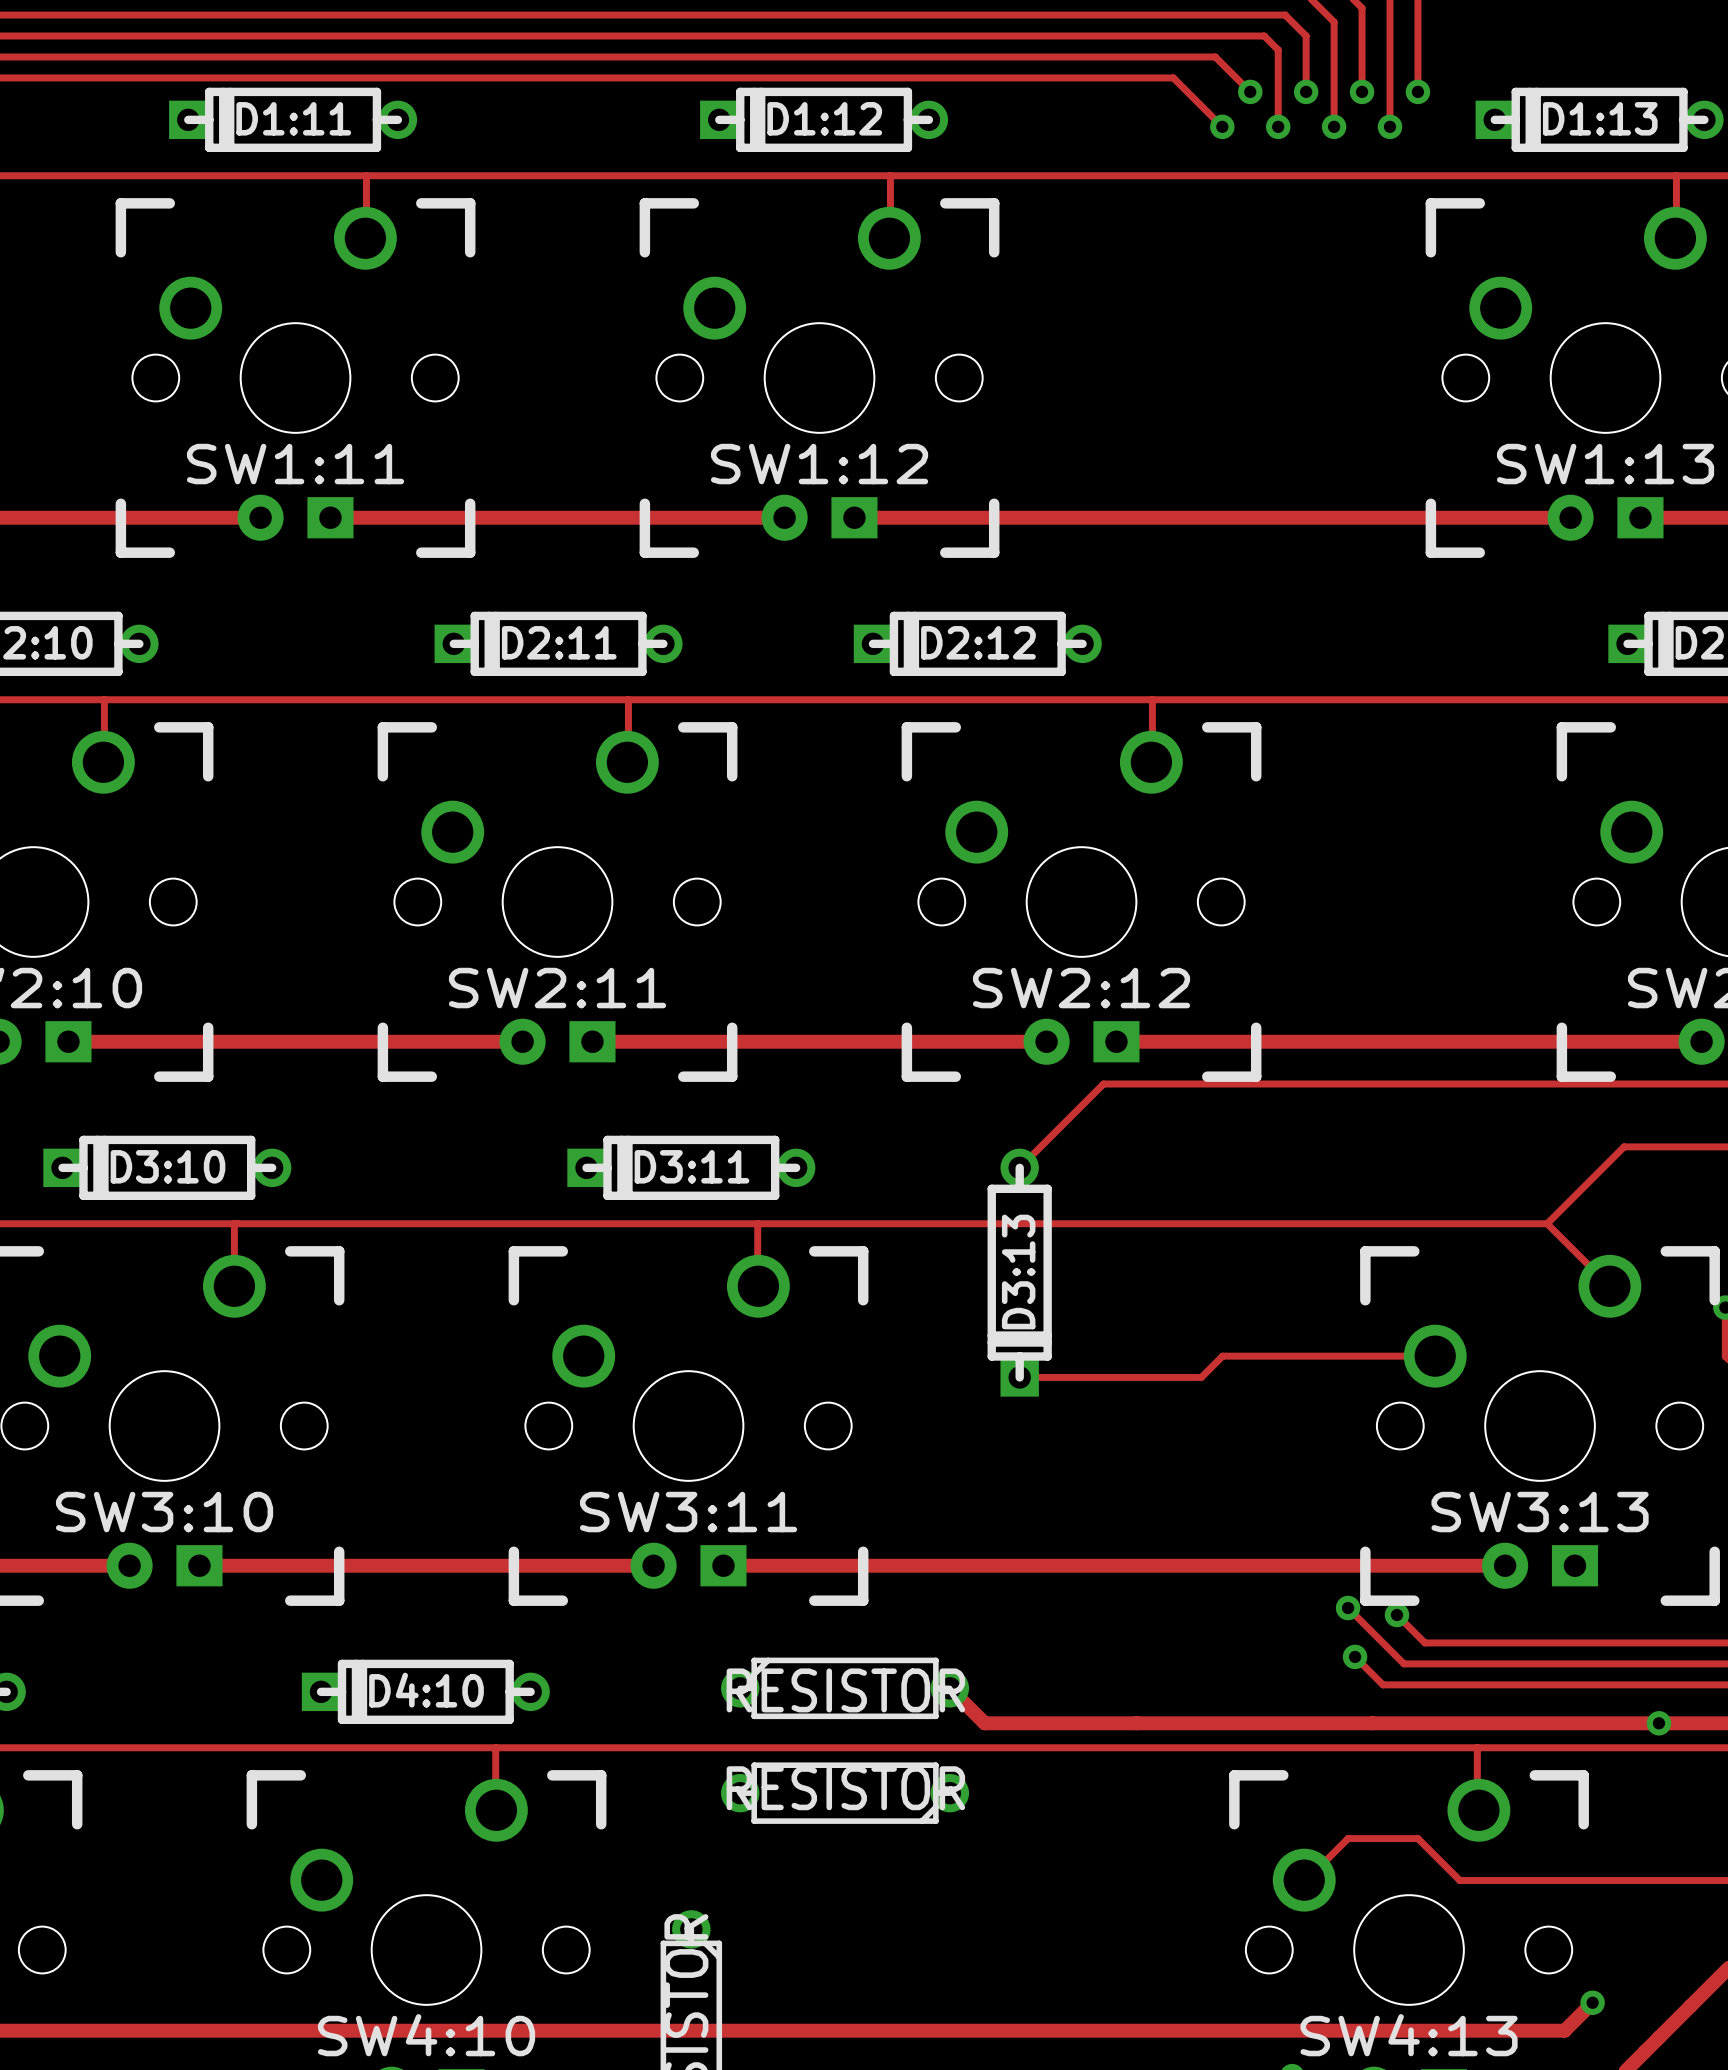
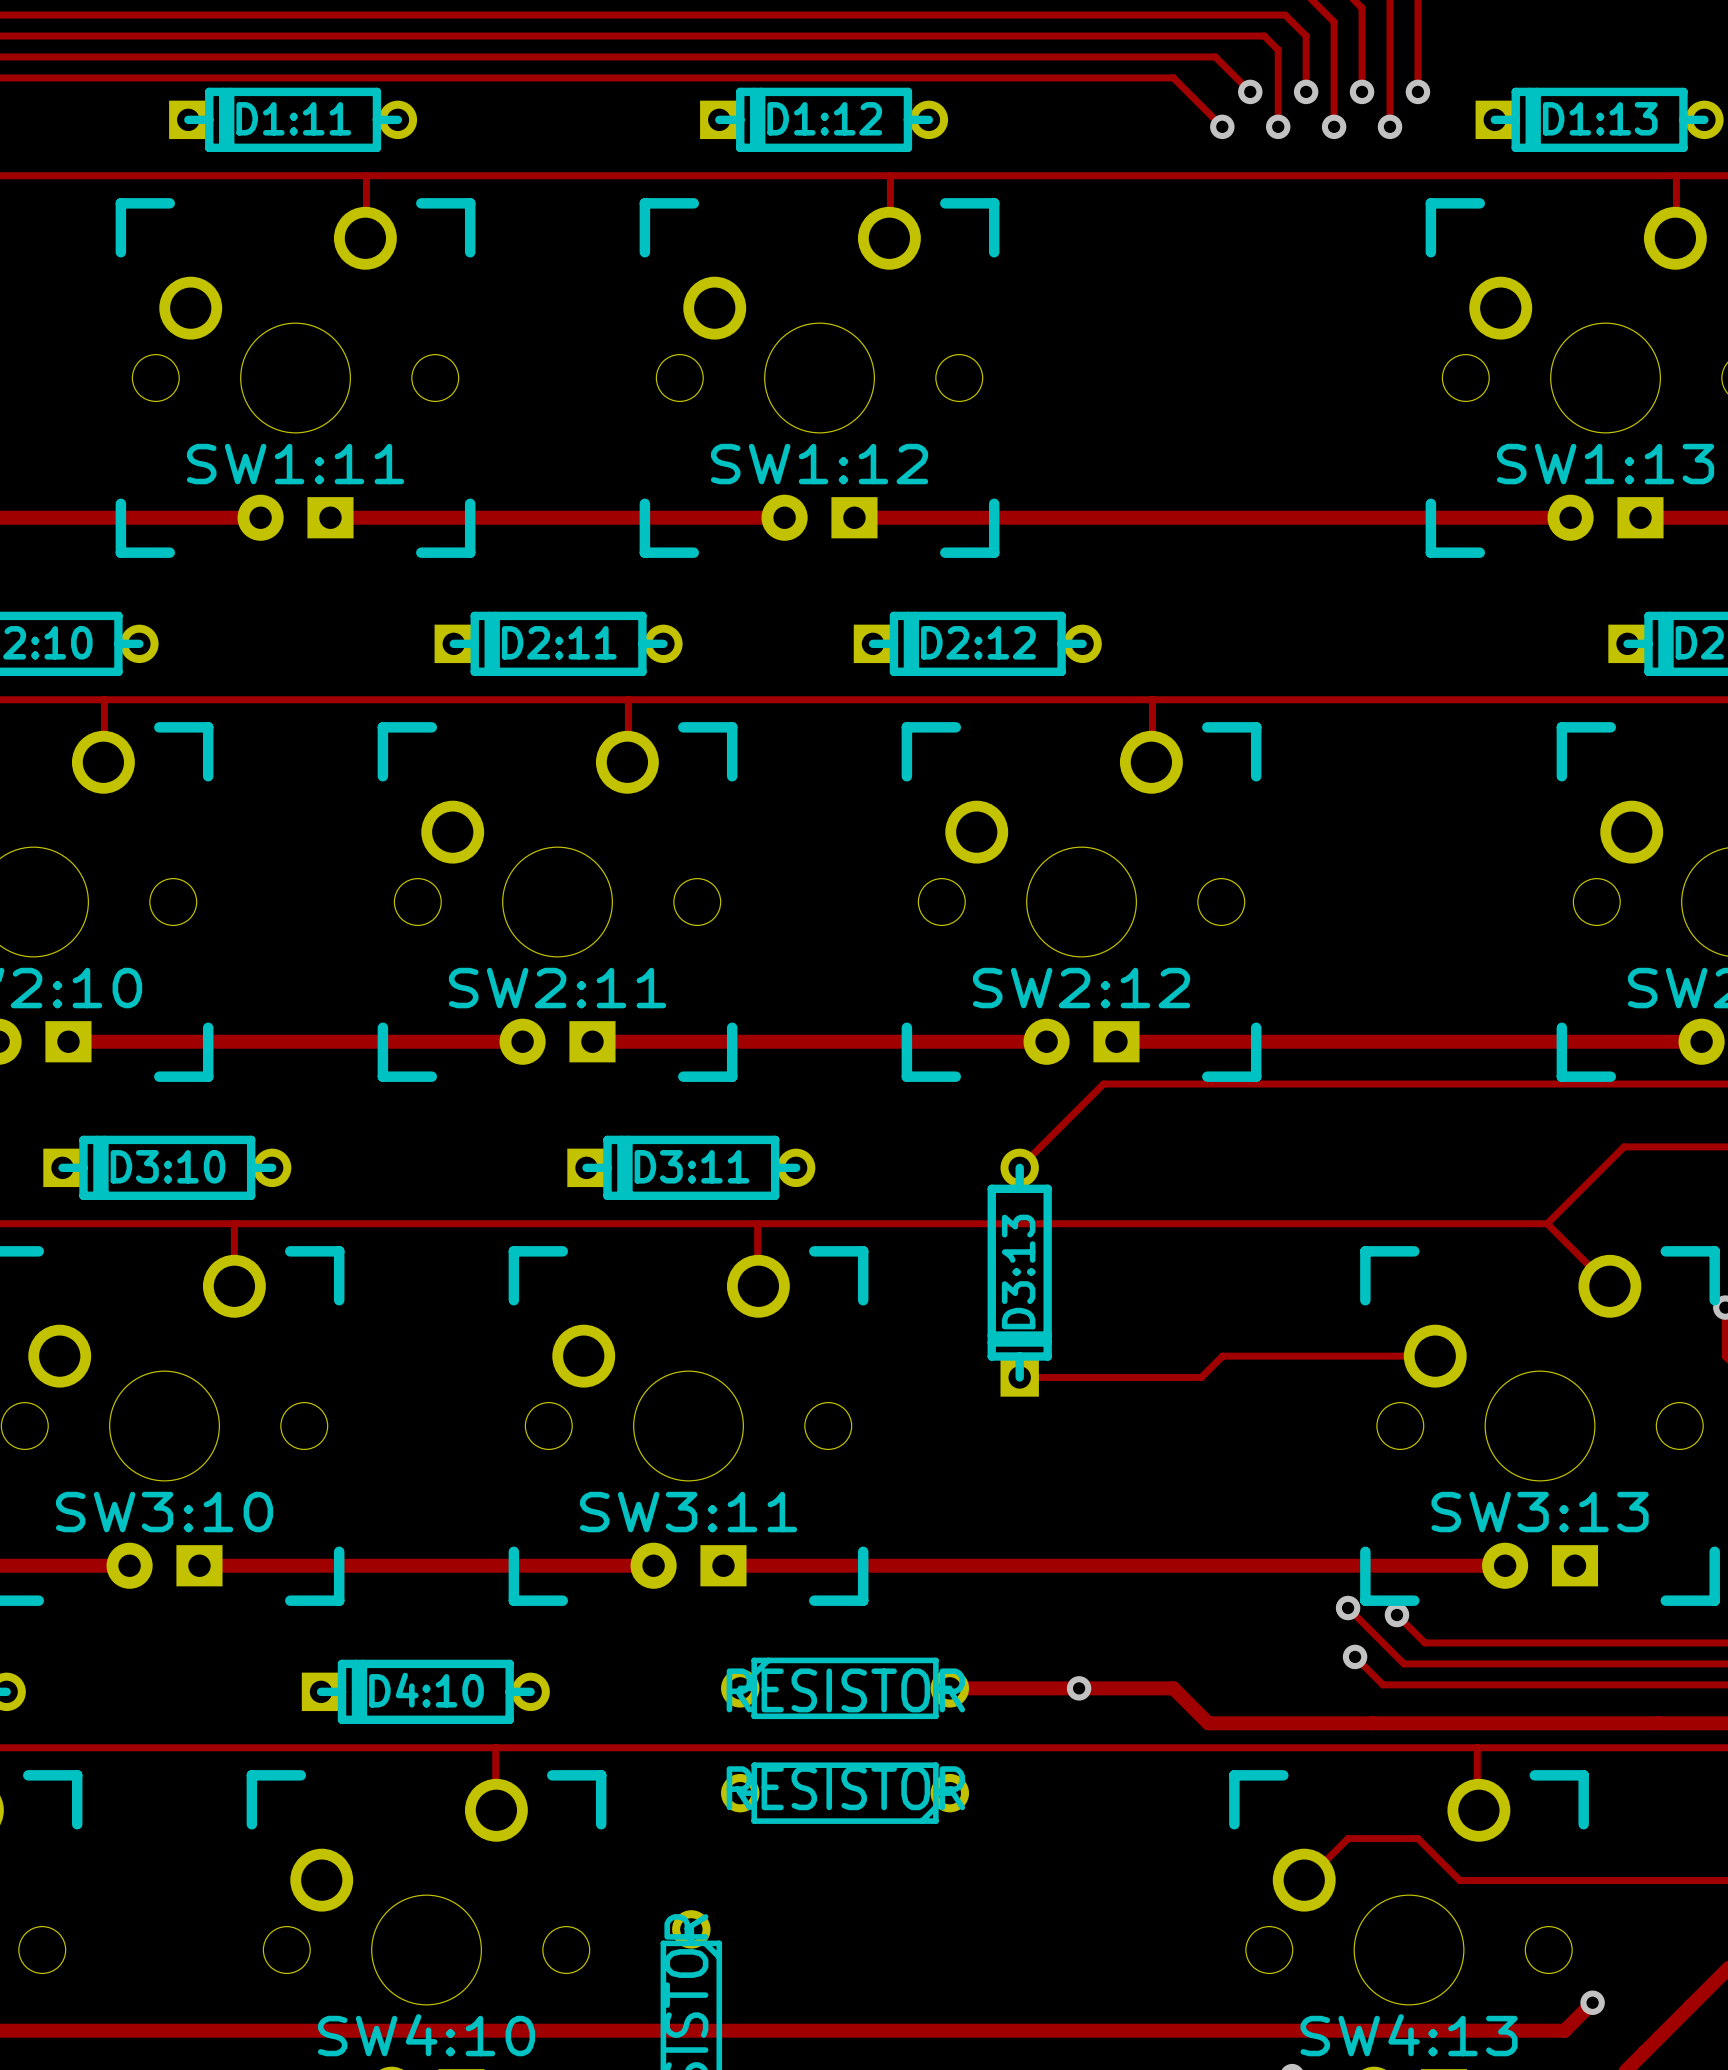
track: (949, 1688) (984, 1723) (1208, 1723) -> (949, 1688) (1173, 1688) (1208, 1723)
via: none -> (1079, 1688)
via: (1658, 1723) -> none

